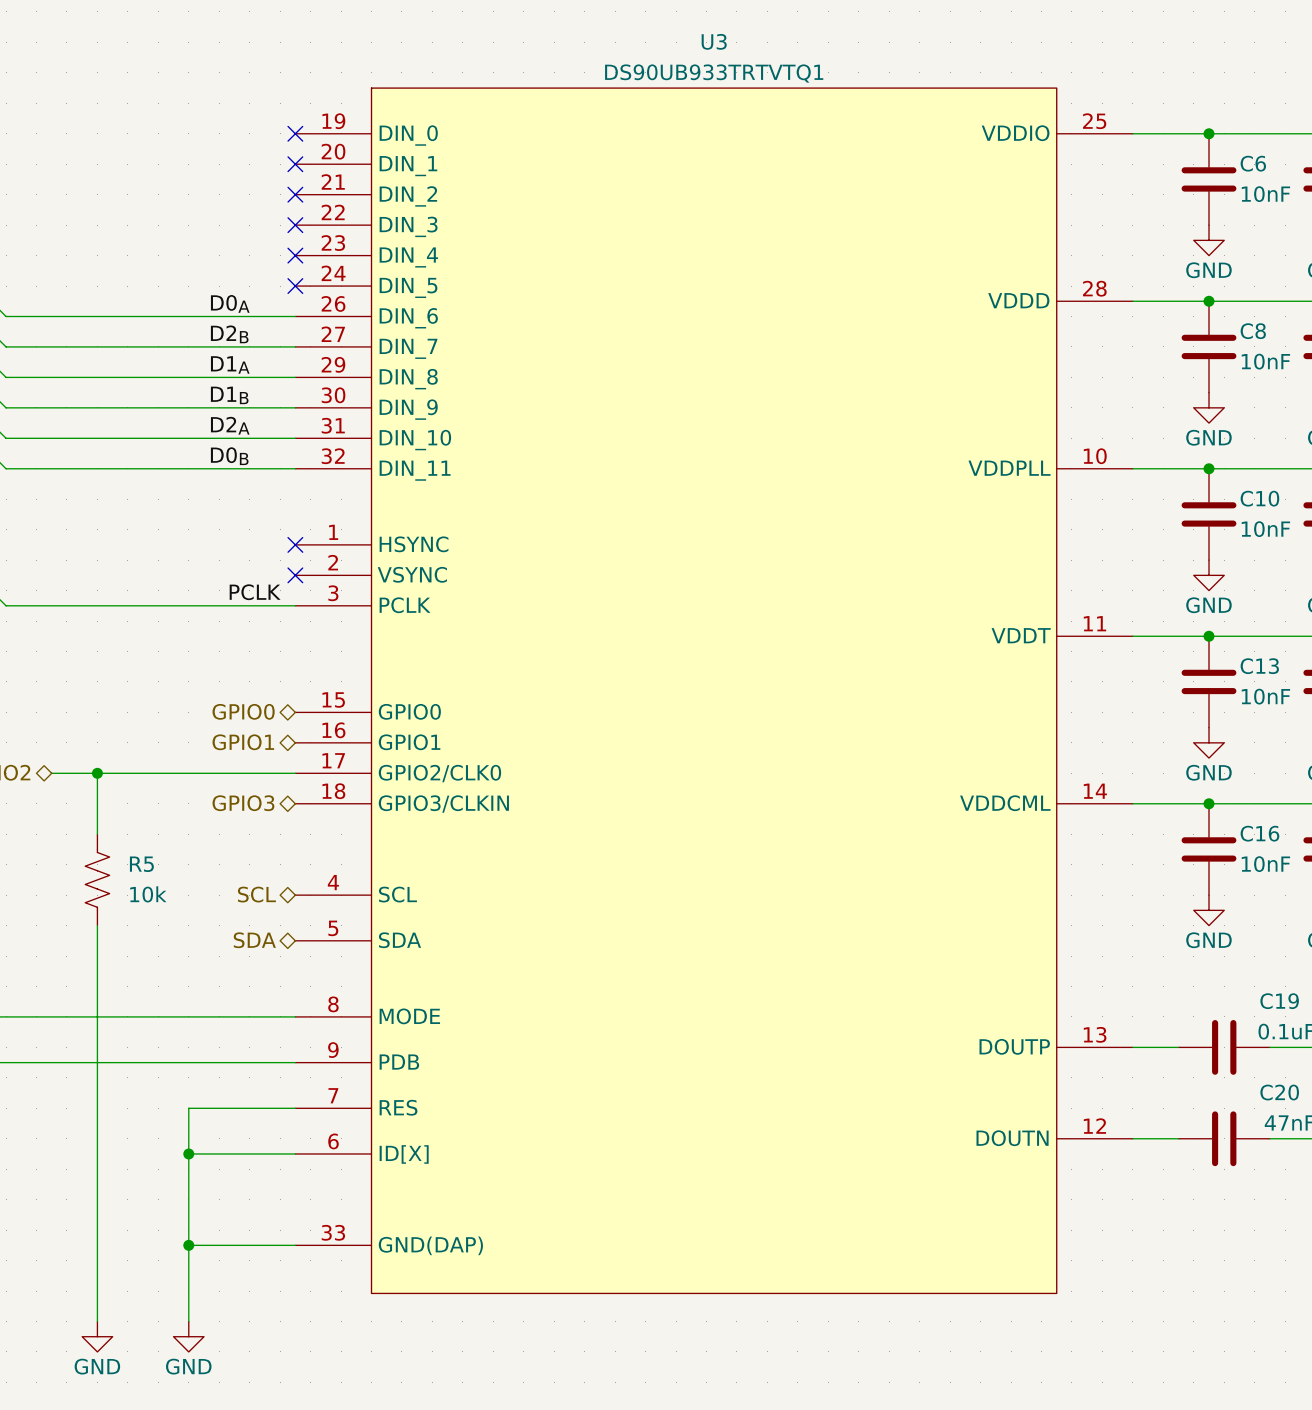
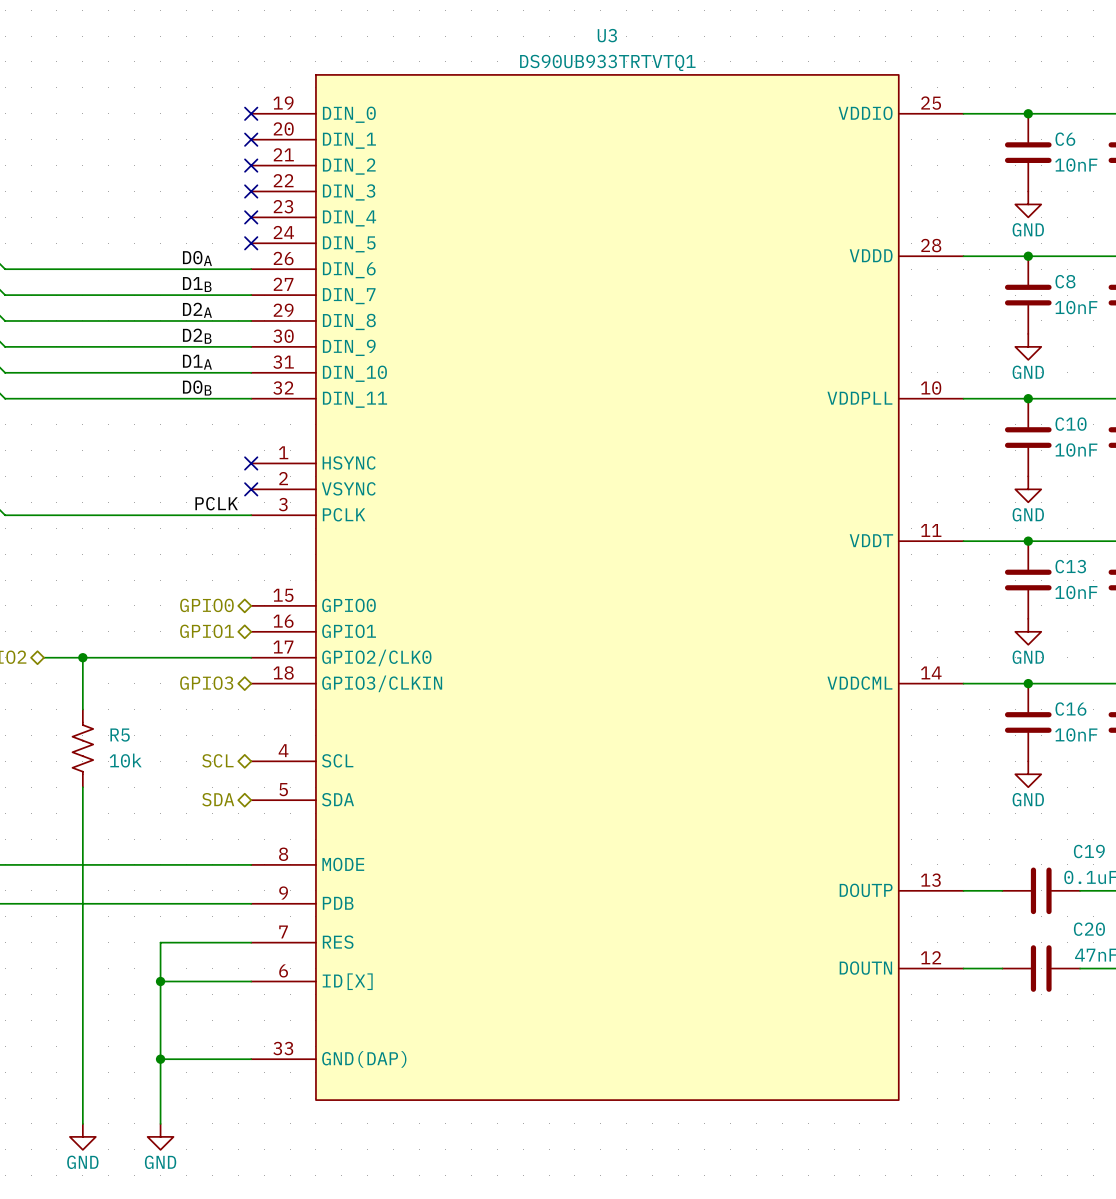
label: D2B (229, 334) -> D1B (197, 284)
label: D1A (230, 364) -> D2A (197, 310)
label: D1B (229, 395) -> D2B (197, 336)
label: D2A (230, 425) -> D1A (197, 362)

